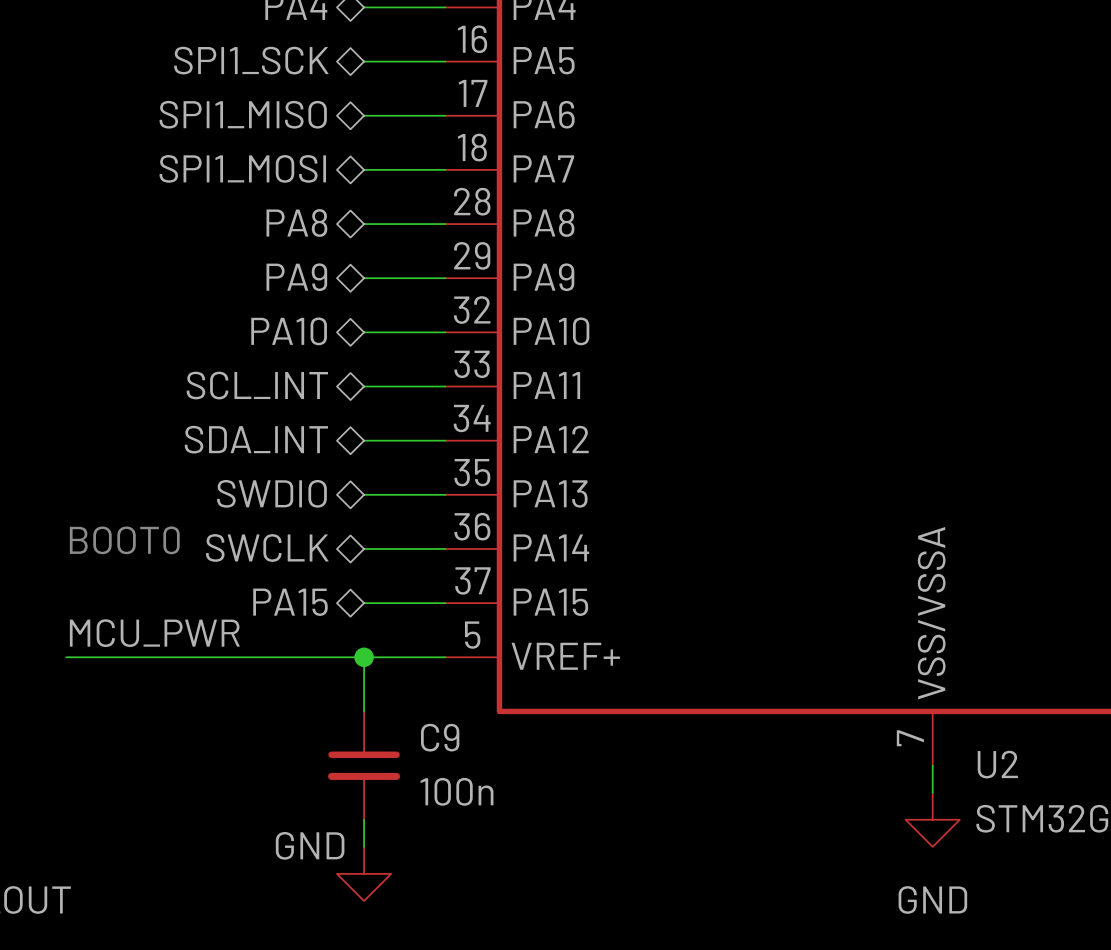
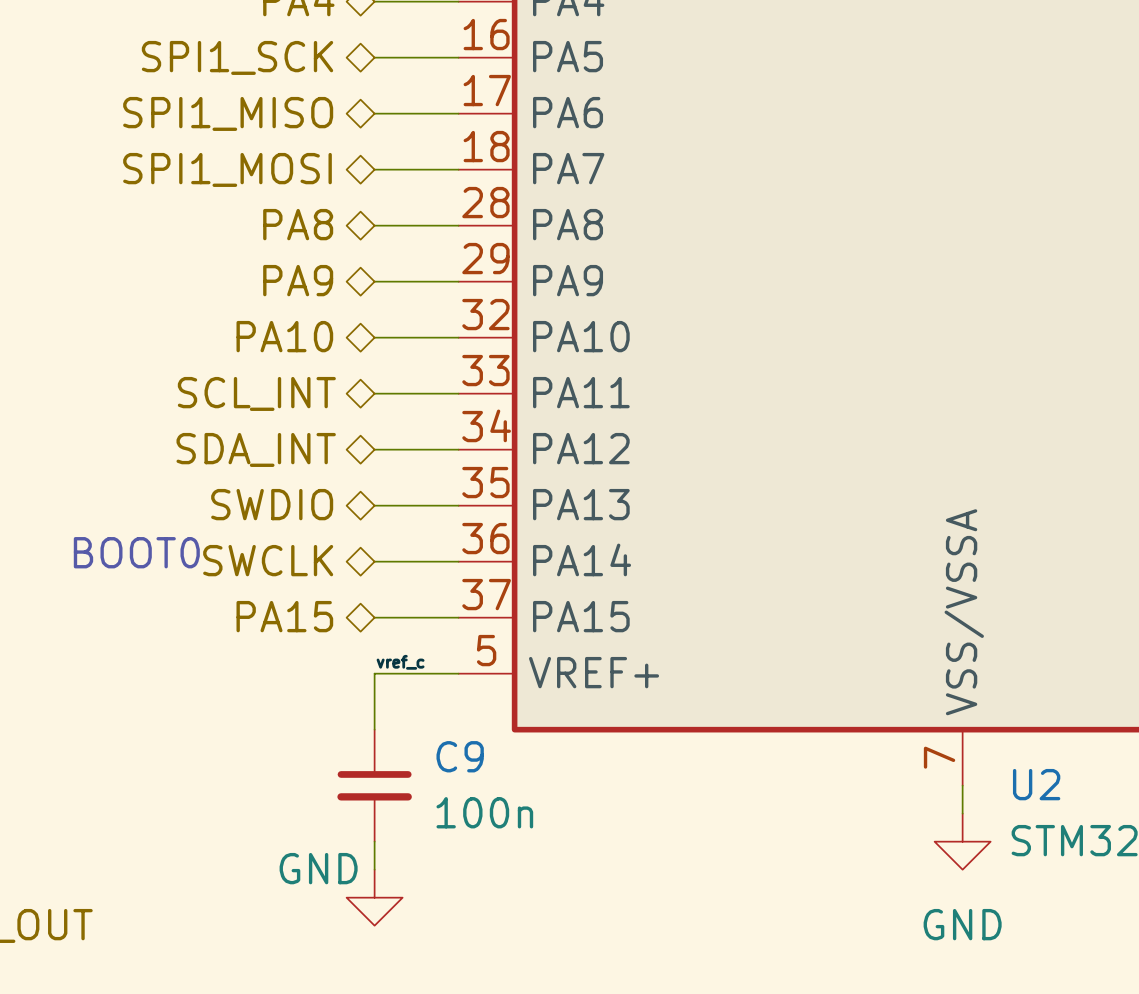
label: MCU_PWR (154, 633) -> none
label: none -> vref_c (400, 662)
wire: (66, 657) (364, 657) -> none
junction: (364, 657) -> none

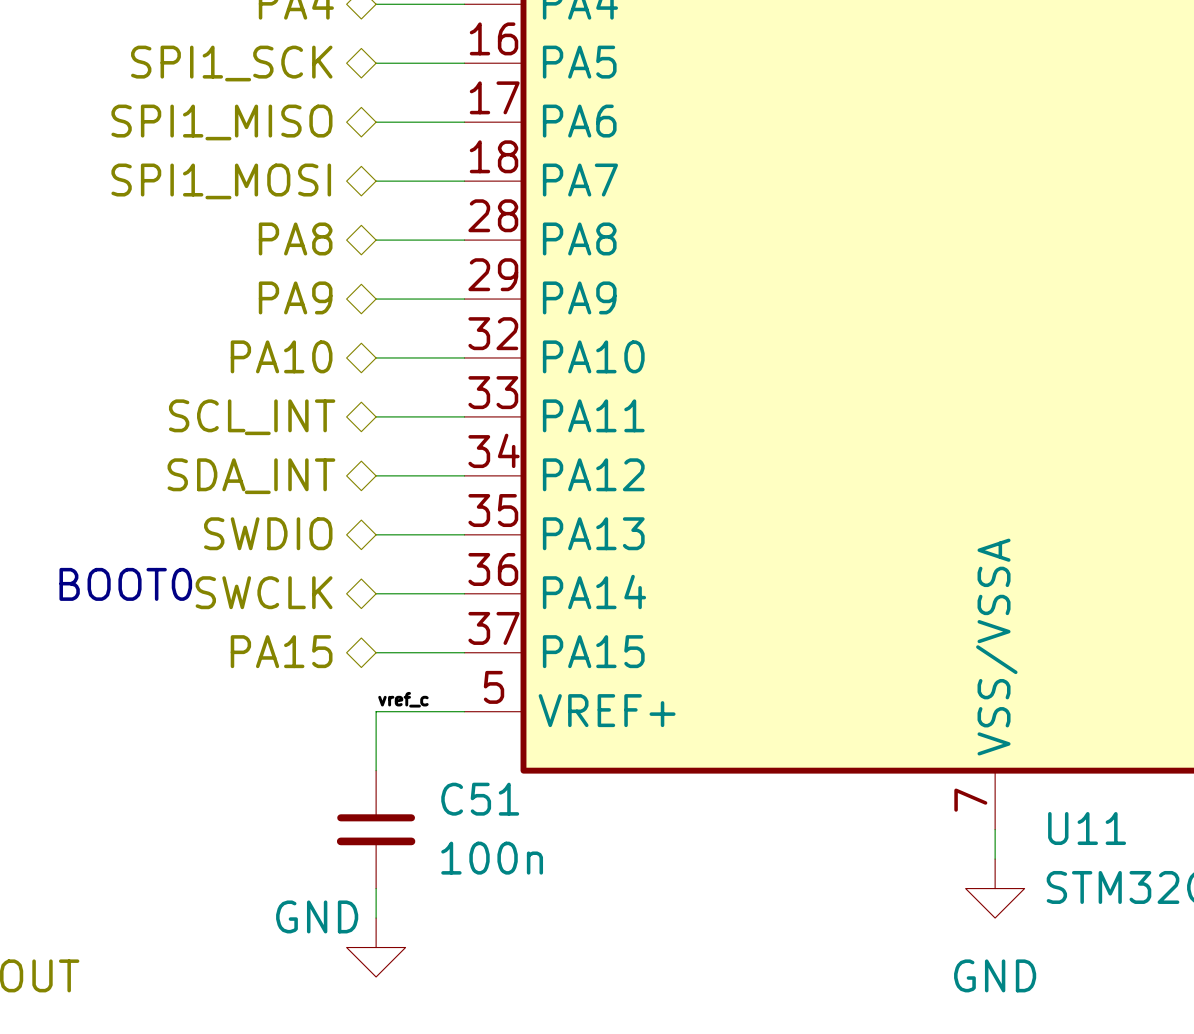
C9 name: C9 (460, 756) -> C51 (480, 799)
U2 name: U2 (1036, 784) -> U11 (1087, 828)

